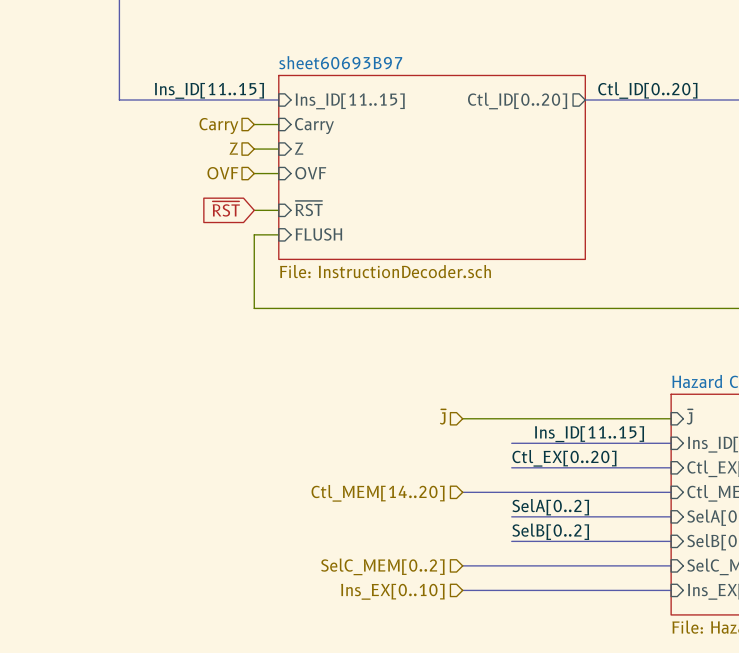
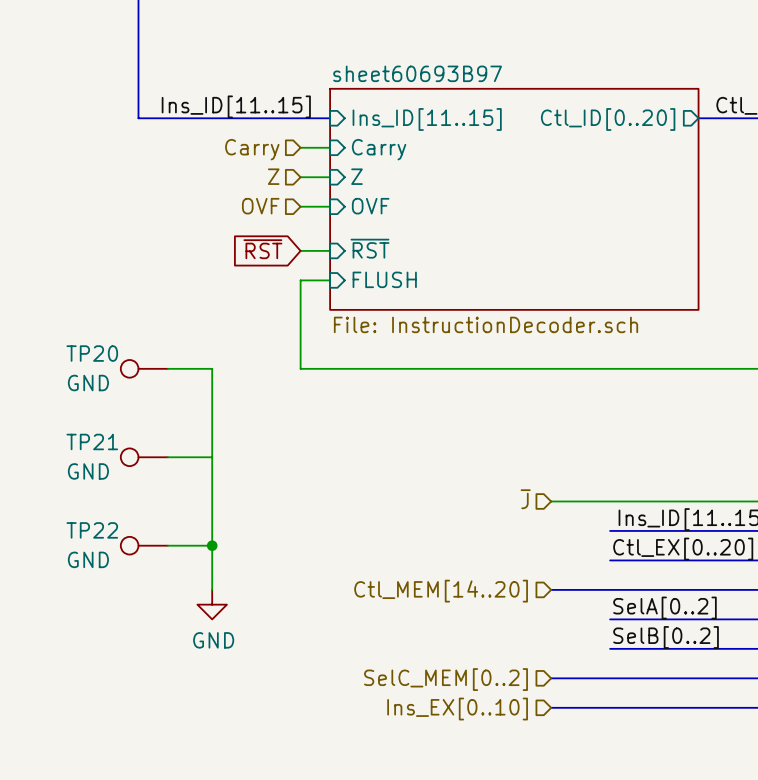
TP20: none -> GND (144, 368)
wire: none -> (167, 368) (212, 368) (212, 589)
TP21: none -> GND (144, 457)
wire: none -> (167, 457) (212, 457)
TP22: none -> GND (144, 545)
wire: none -> (167, 545) (212, 545)
junction: none -> (212, 545)
power symbol: none -> GND (212, 604)

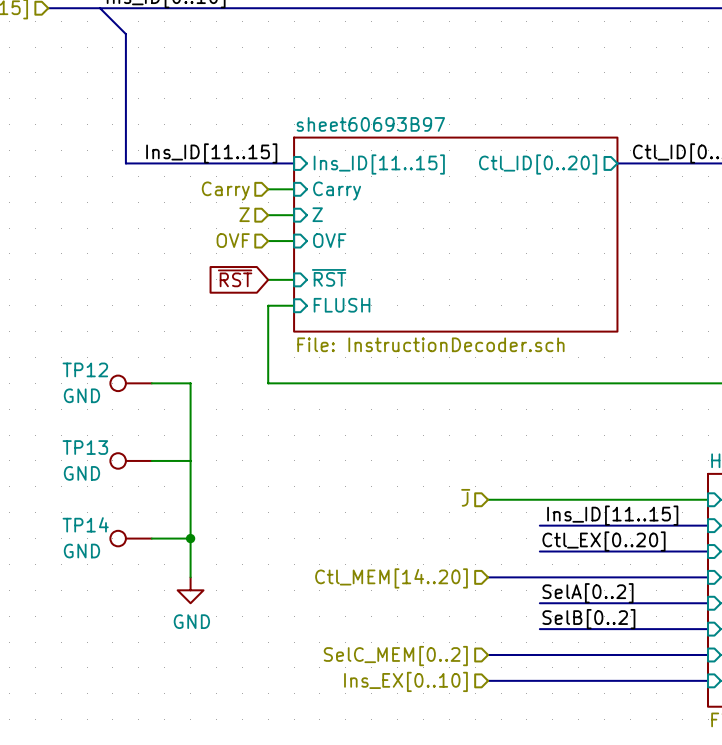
TP20 name: TP20 (92, 353) -> TP12 (85, 369)
TP21 name: TP21 (92, 441) -> TP13 (85, 447)
TP22 name: TP22 (92, 530) -> TP14 (85, 524)

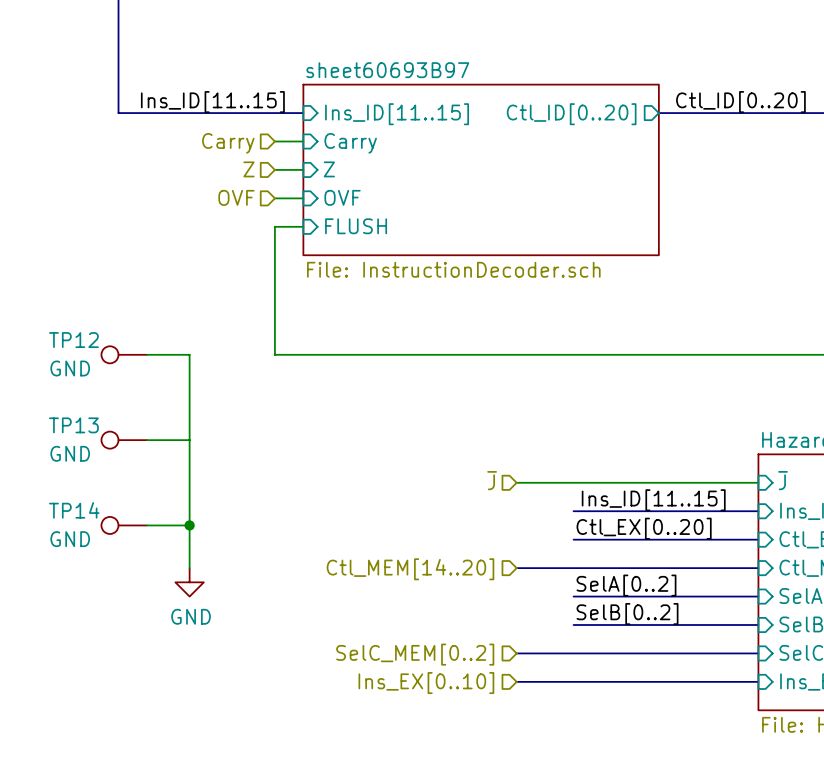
sheet sheet60693B97 shape: [294, 137, 618, 332] -> [303, 84, 659, 256]
sheet pin: ~{RST} (329, 277) -> none
global label: ~{RST} (235, 278) -> none
wire: (268, 279) (294, 279) -> none
wire: (268, 305) (294, 305) -> (274, 269) (274, 226) (303, 226)
sheet pin position: FLUSH (342, 305) -> FLUSH (356, 226)

